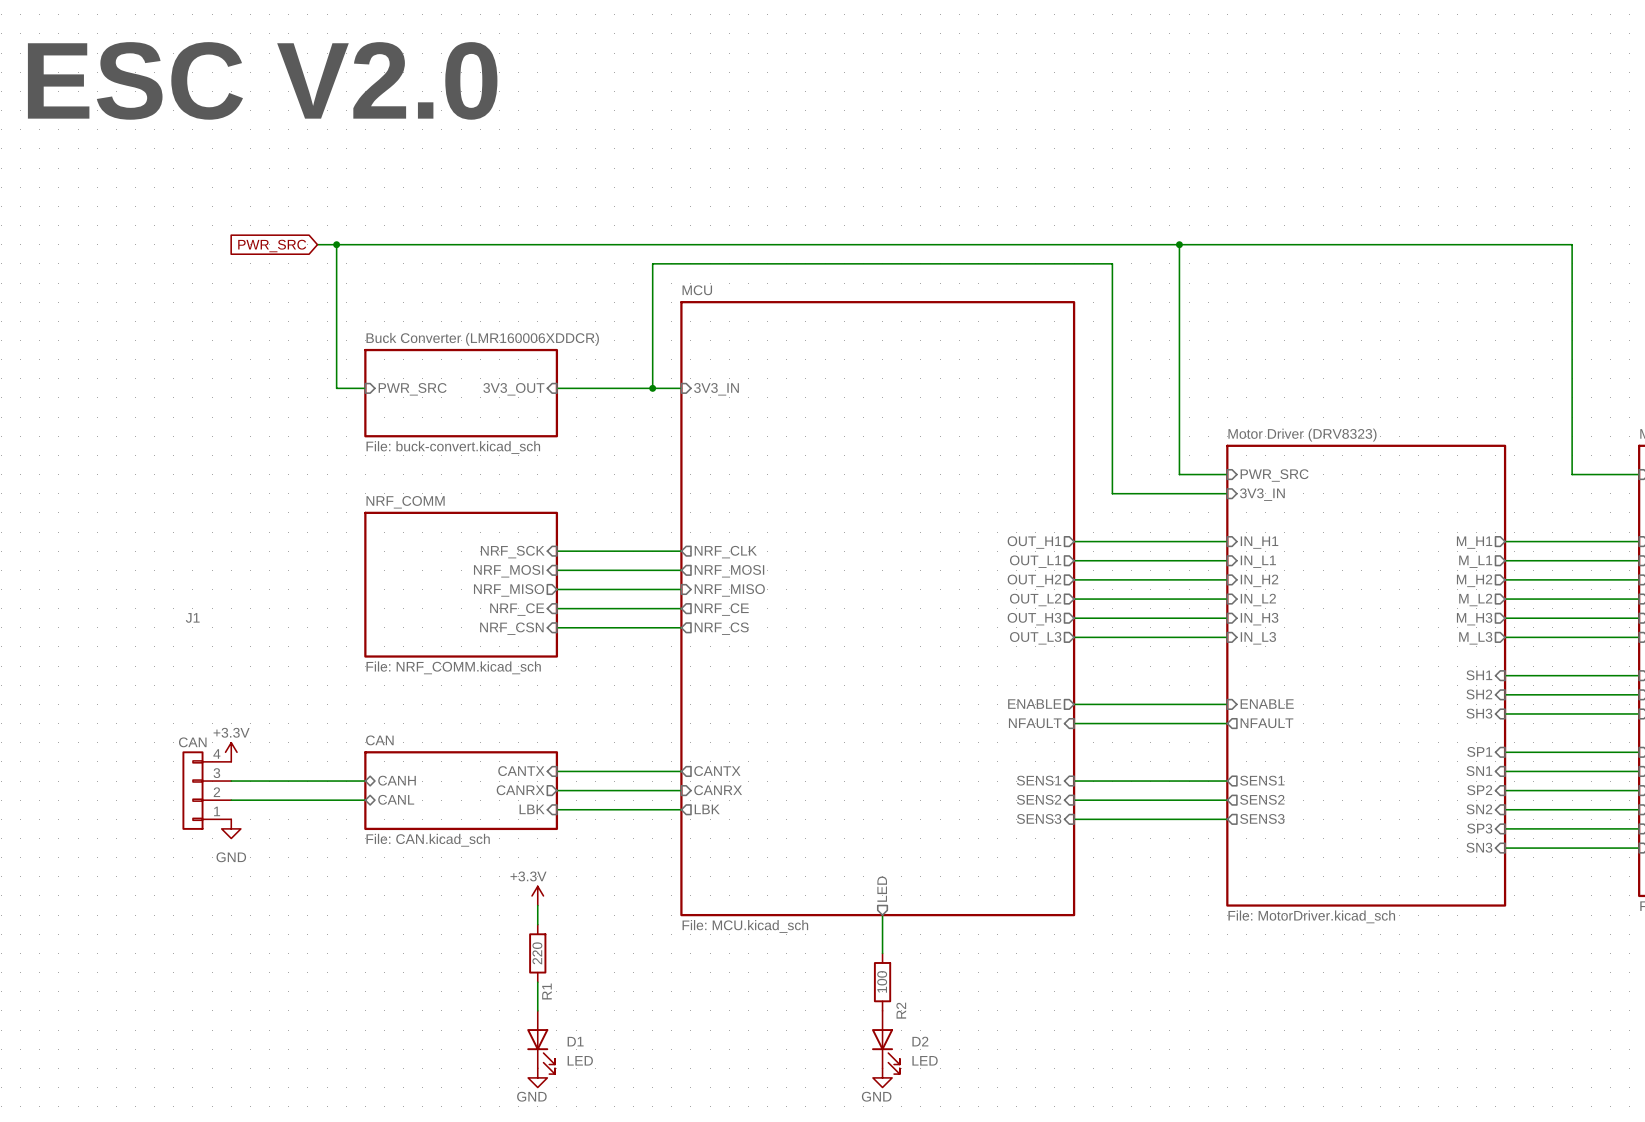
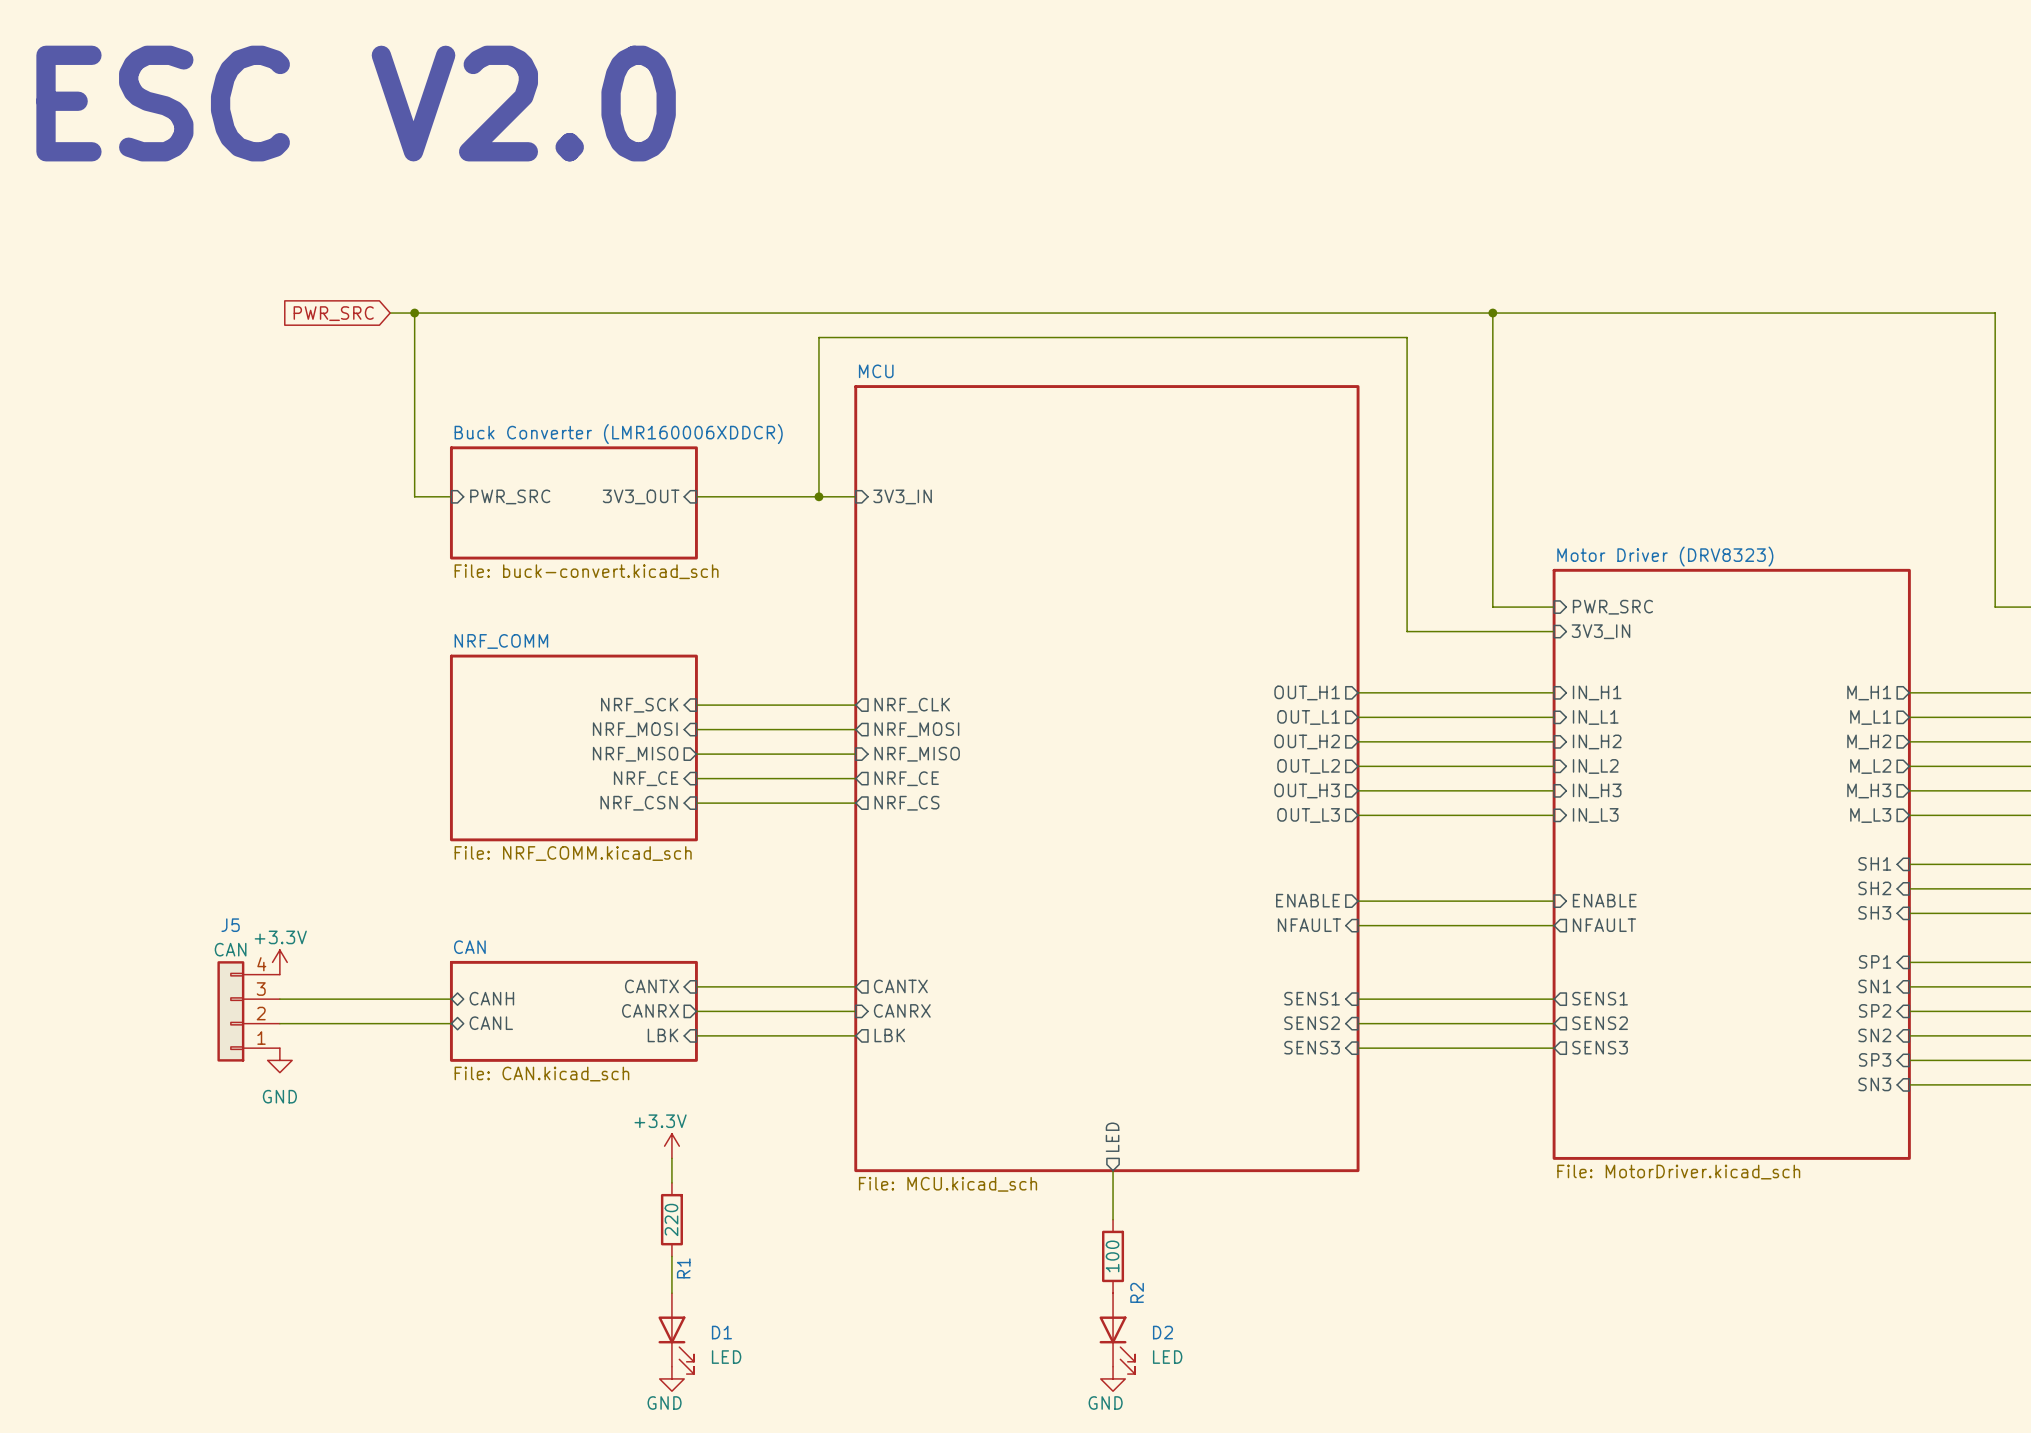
J1 name: J1 (192, 617) -> J5 (230, 925)

